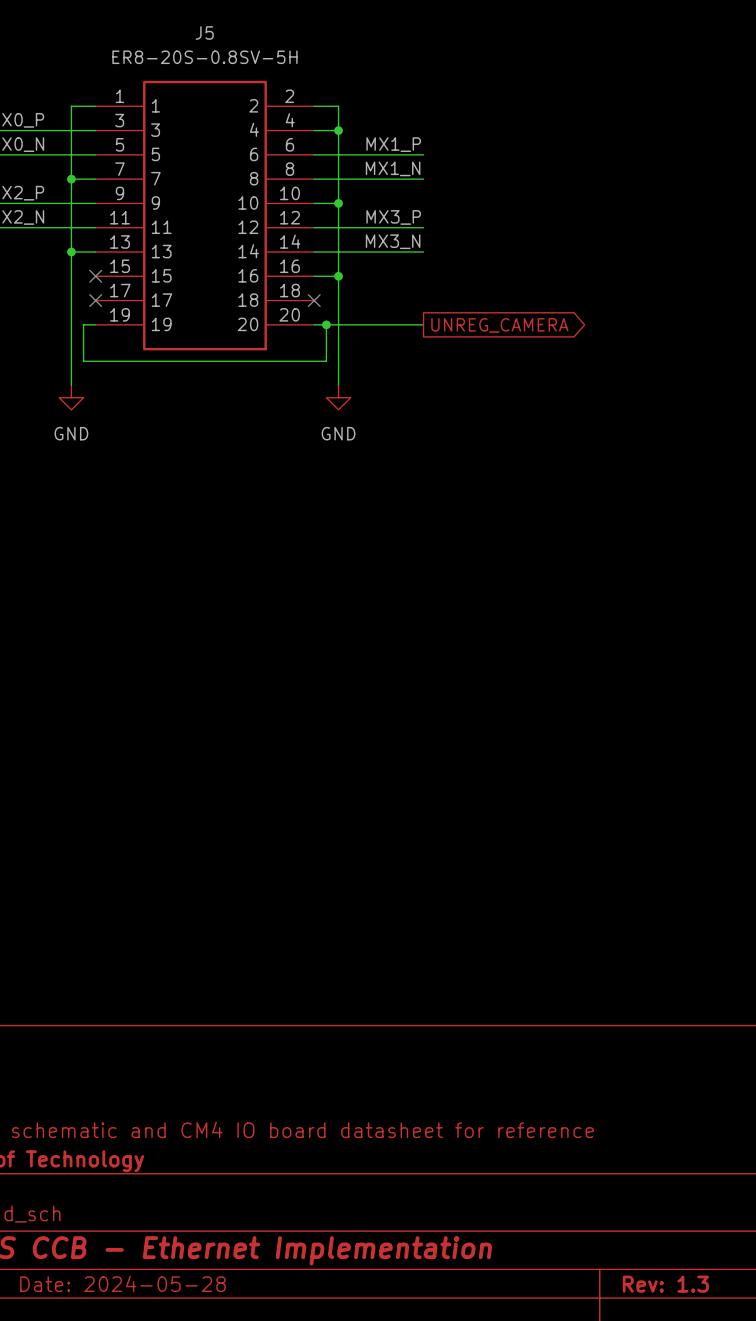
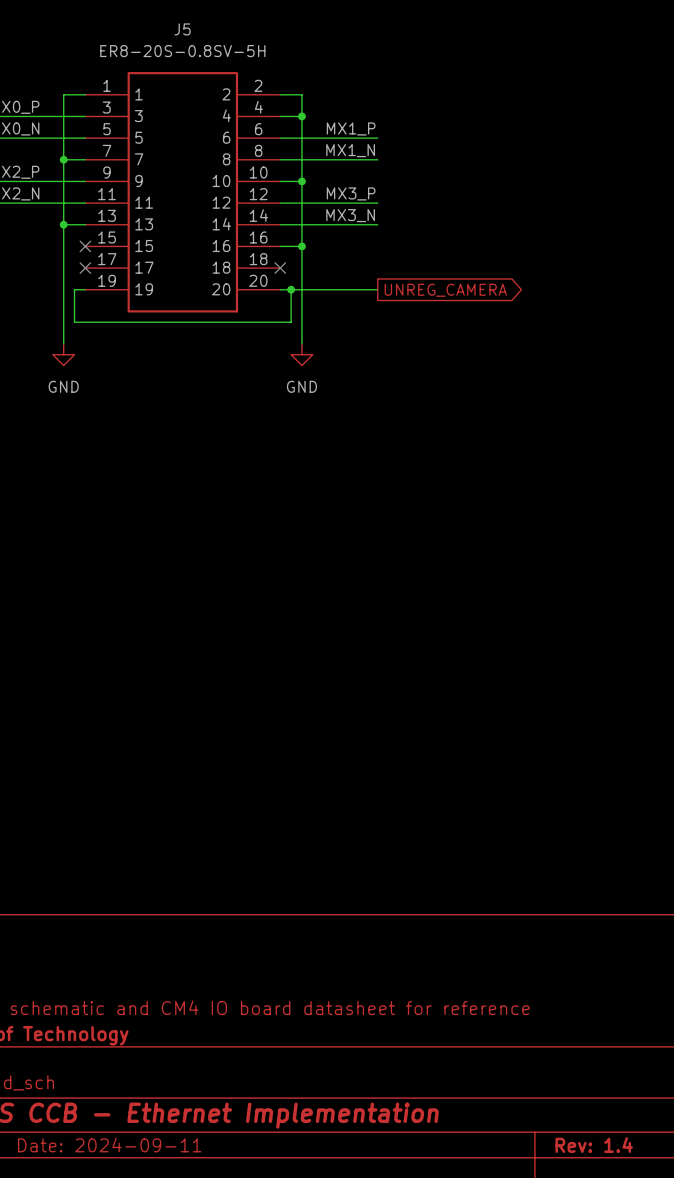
title block: Date: 2024-05-28 (123, 1283) -> Date: 2024-09-11 (109, 1145)
title block: Rev: 1.3 (665, 1284) -> Rev: 1.4 (594, 1145)

